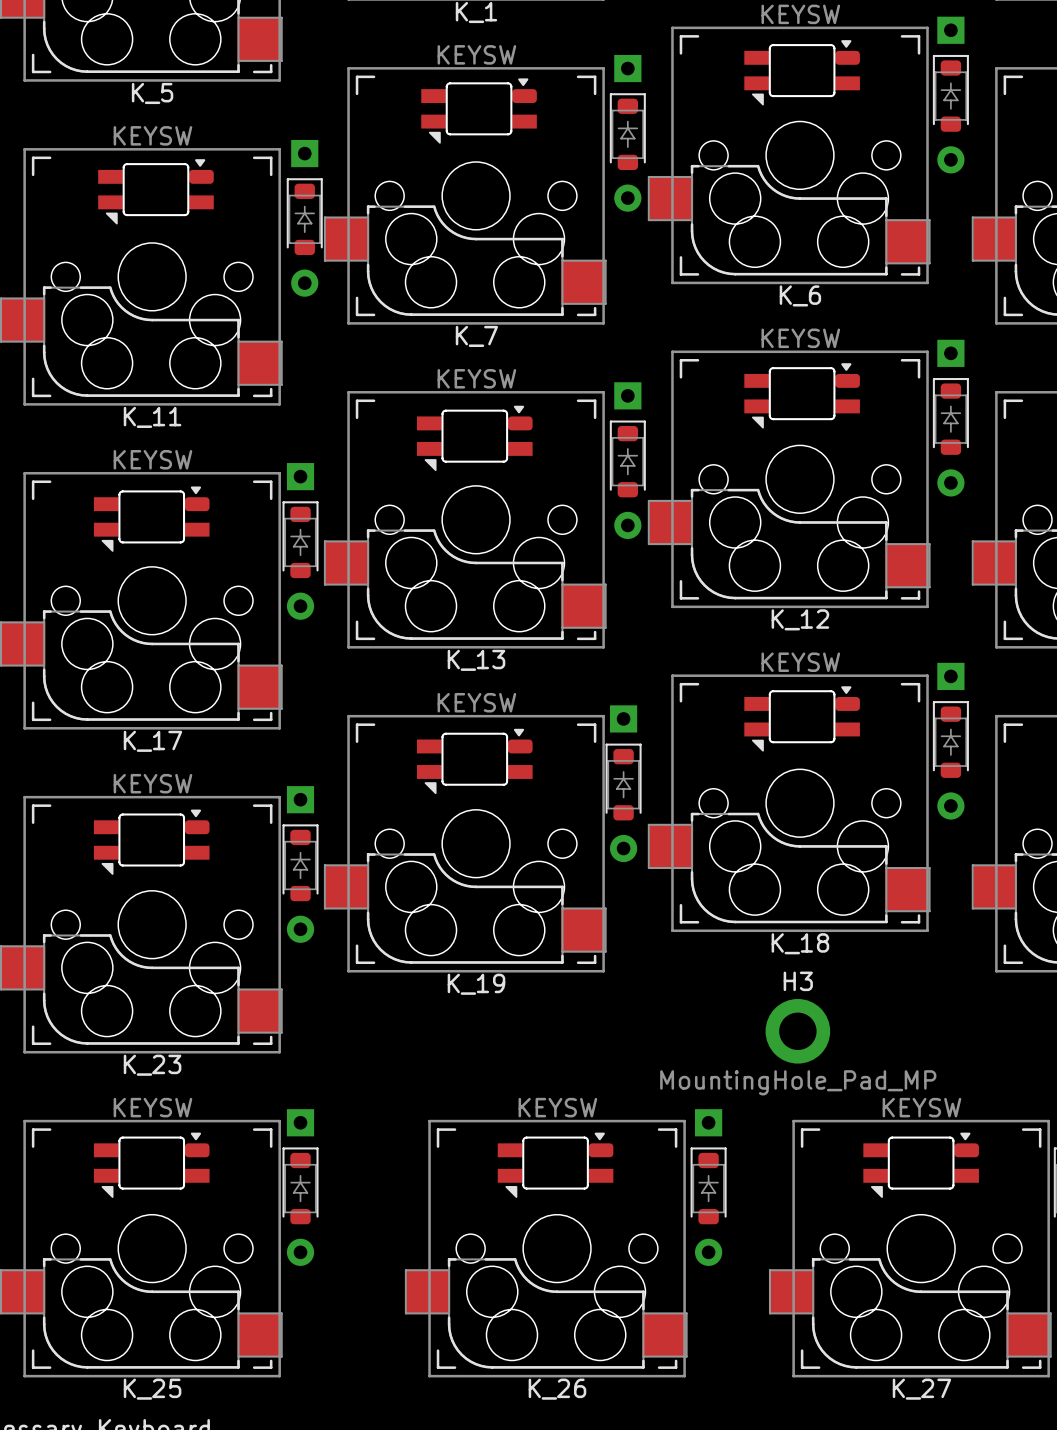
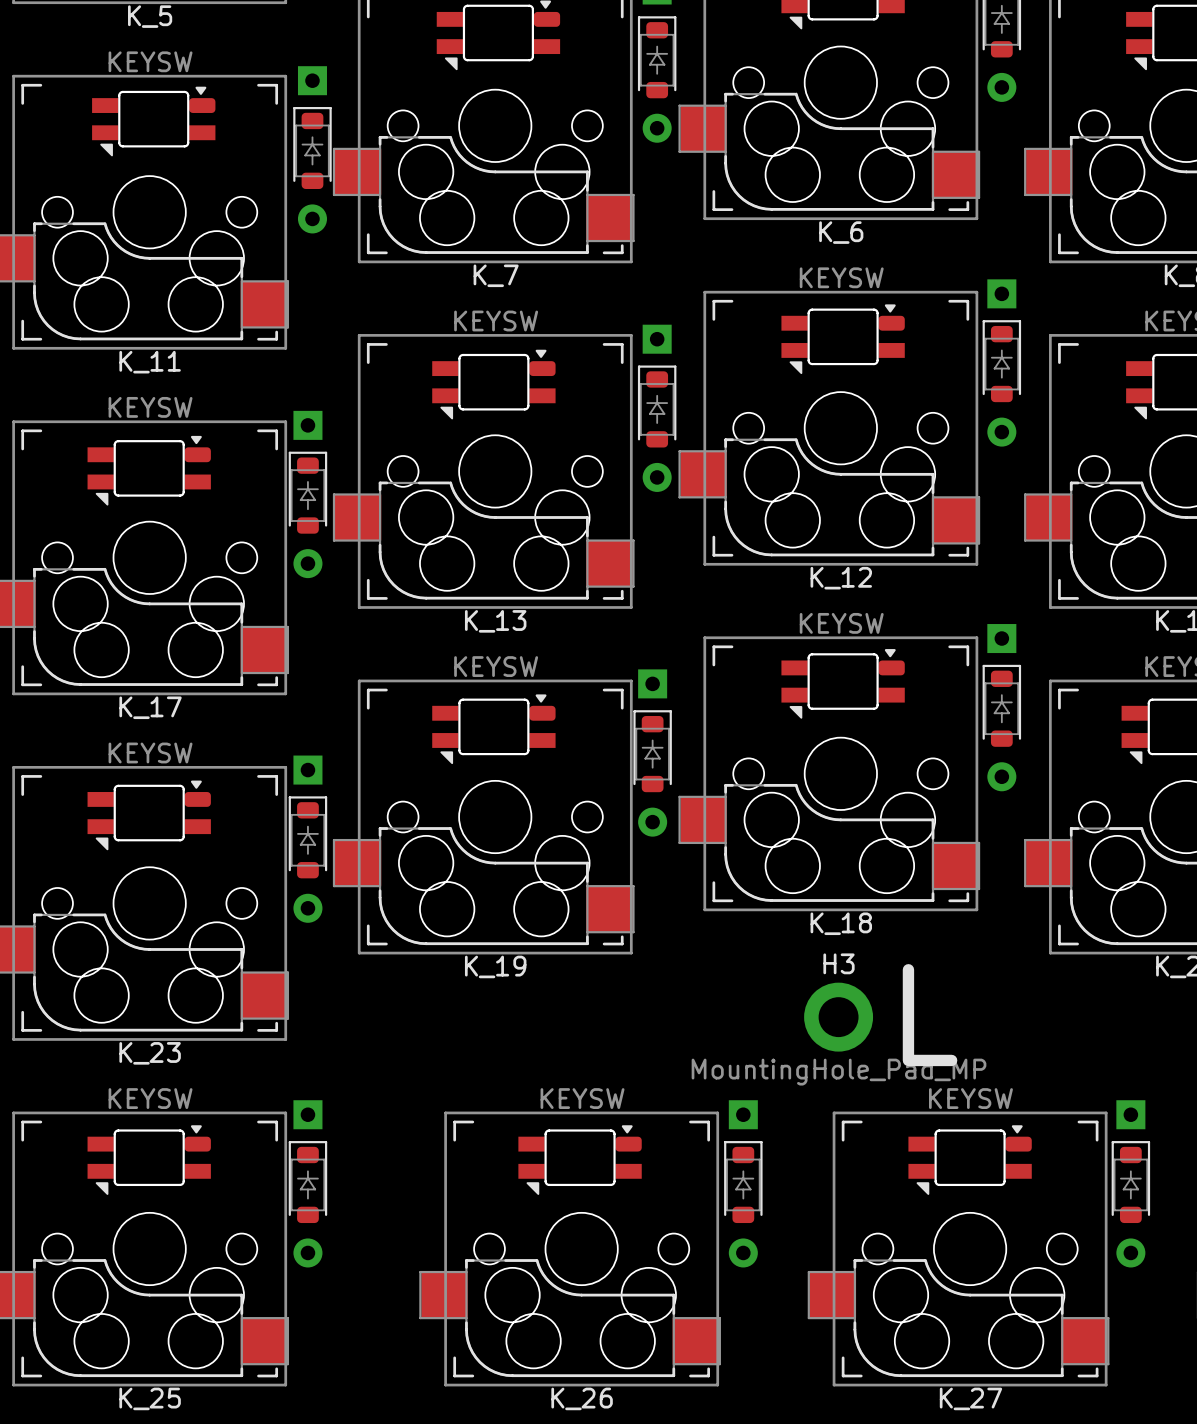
text: none -> L (930, 1015)

